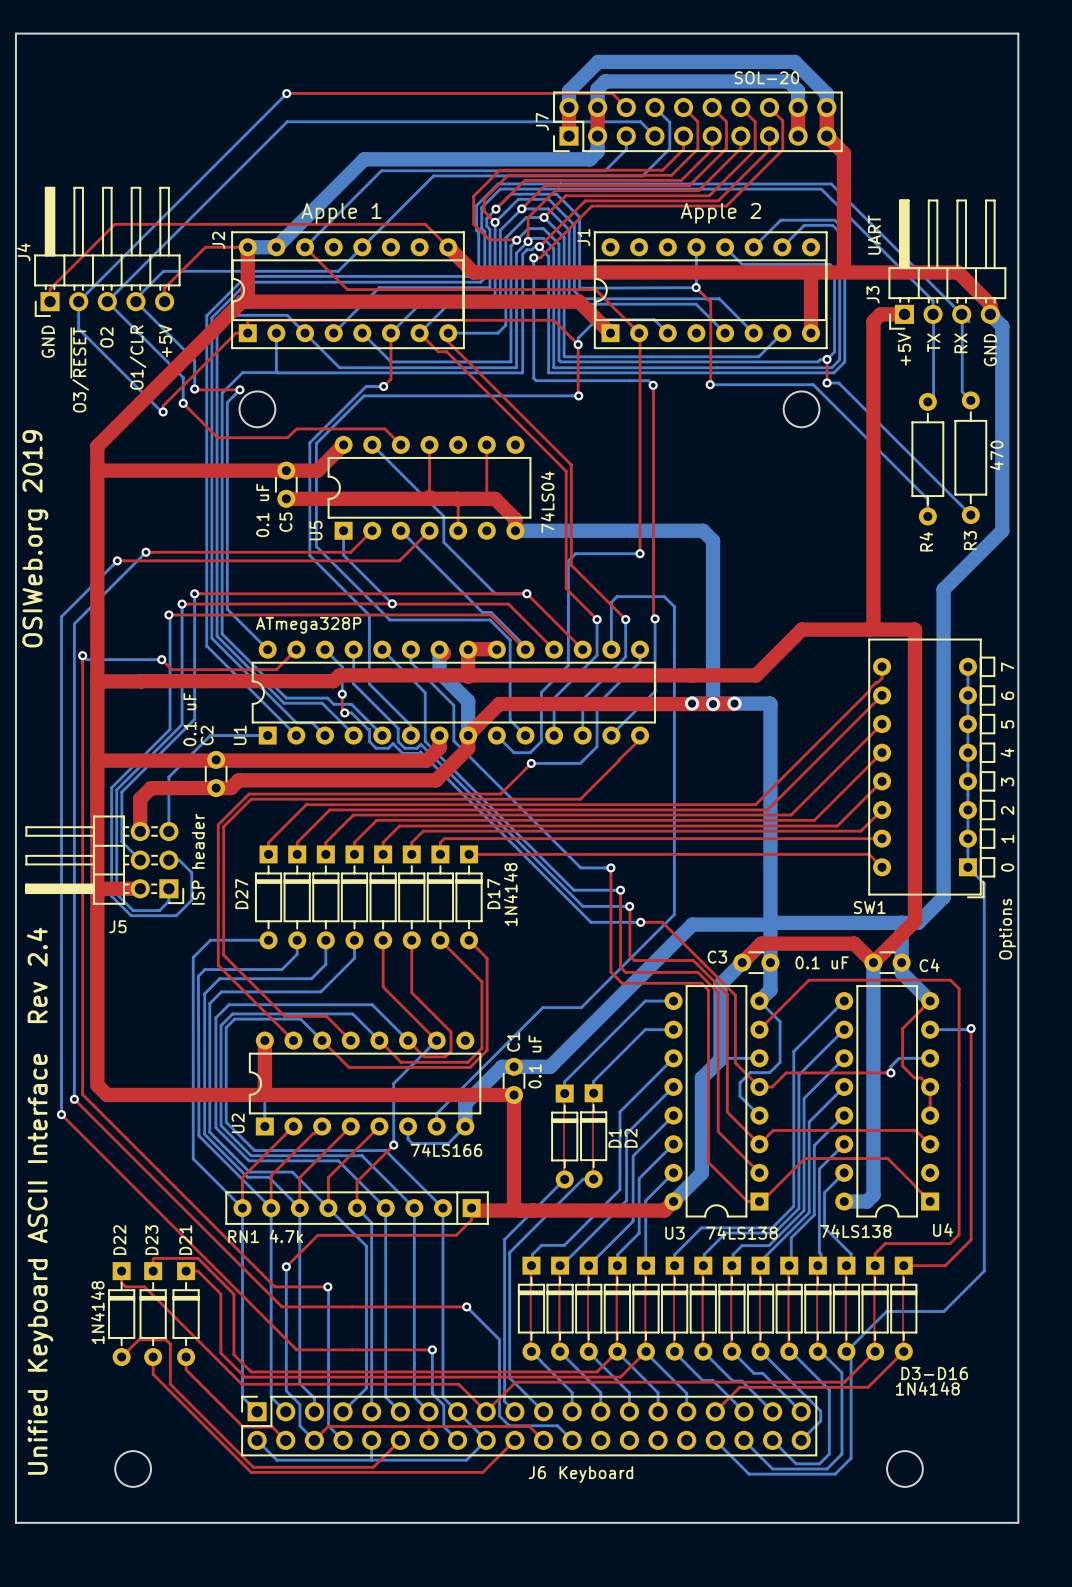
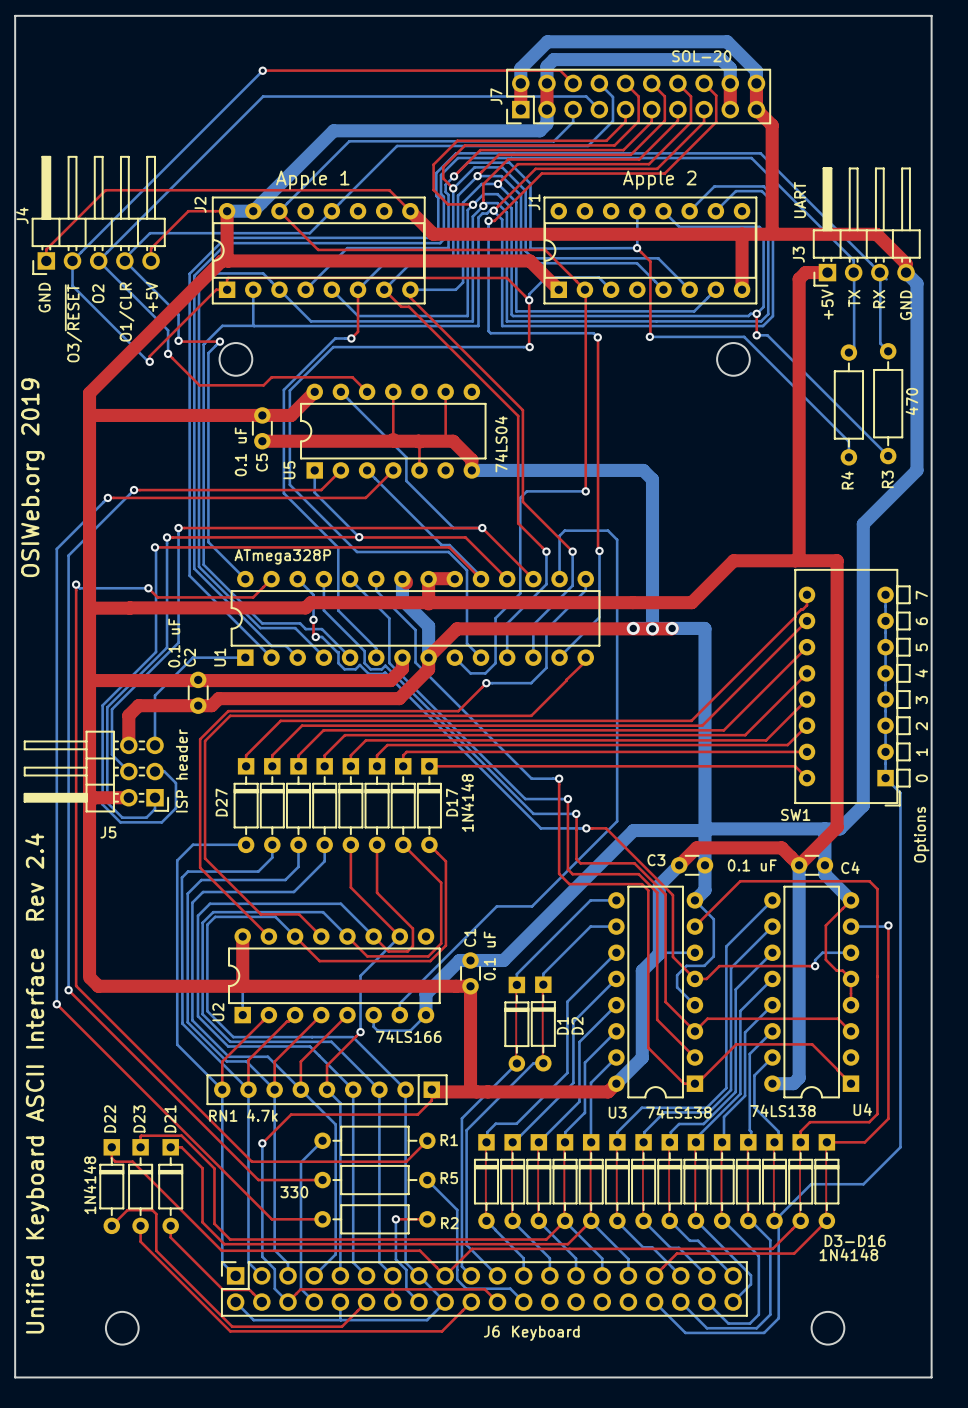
bottom track: none -> (322, 1140) (300, 1162)
R1: none -> (374, 1140)
top track: none -> (427, 1140) (406, 1161) (300, 1161)
via: (327, 1286) -> none
top track: (352, 1306) (467, 1306) -> none
R5: none -> 330 (374, 1180)
via: (466, 1306) -> none
top track: (352, 1349) (432, 1349) -> (427, 1219) (395, 1219)
R2: none -> (374, 1219)

